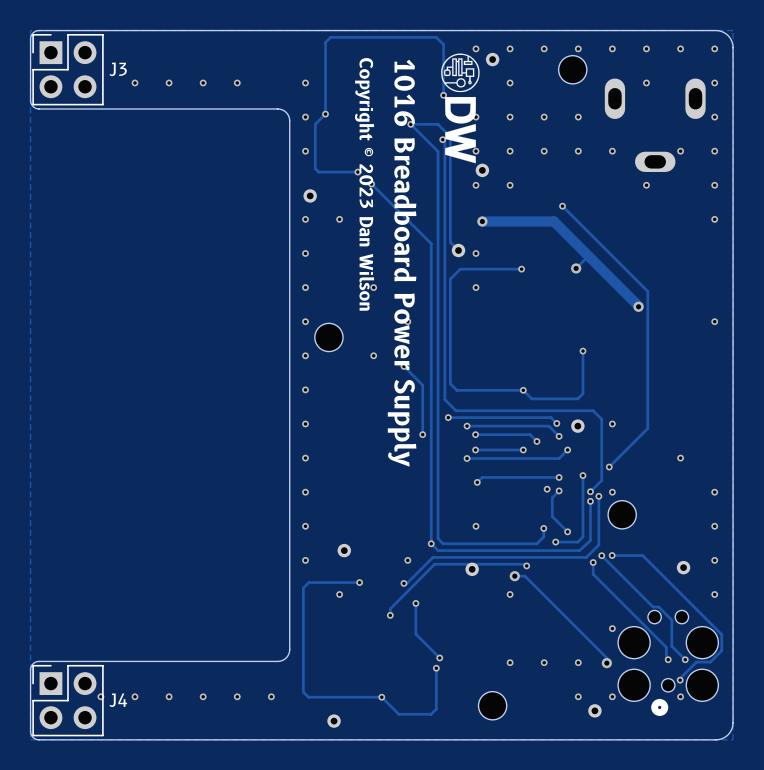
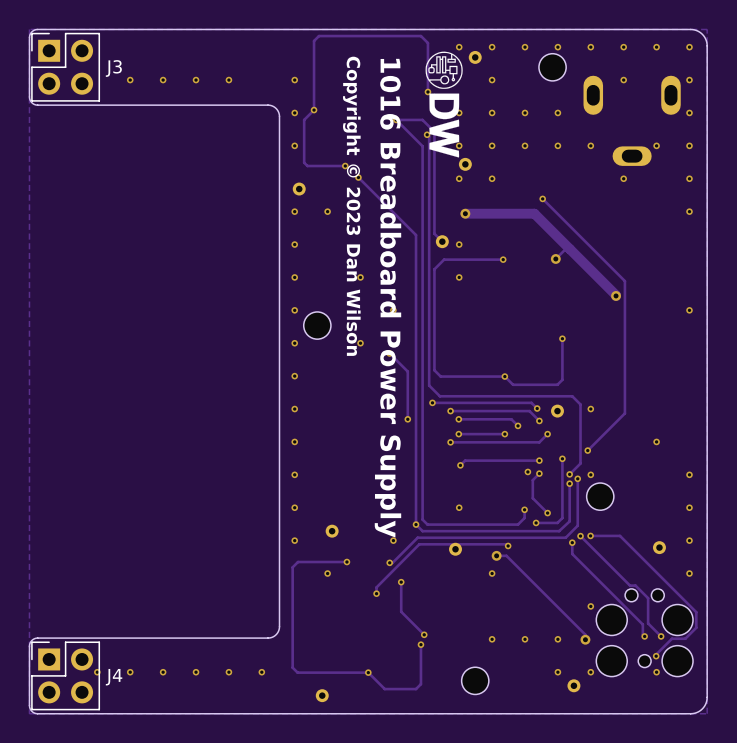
part footprint: [618, 610, 719, 716] -> [596, 588, 694, 677]

